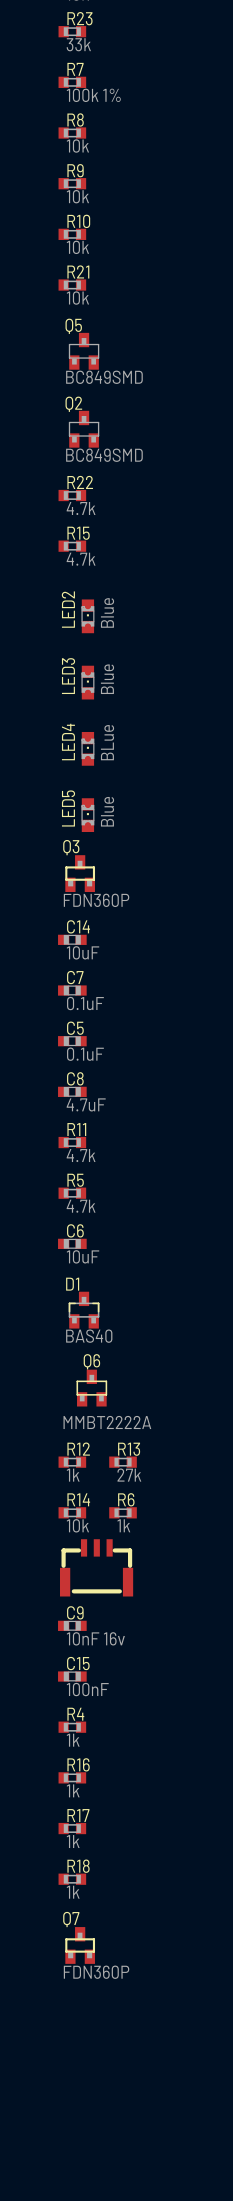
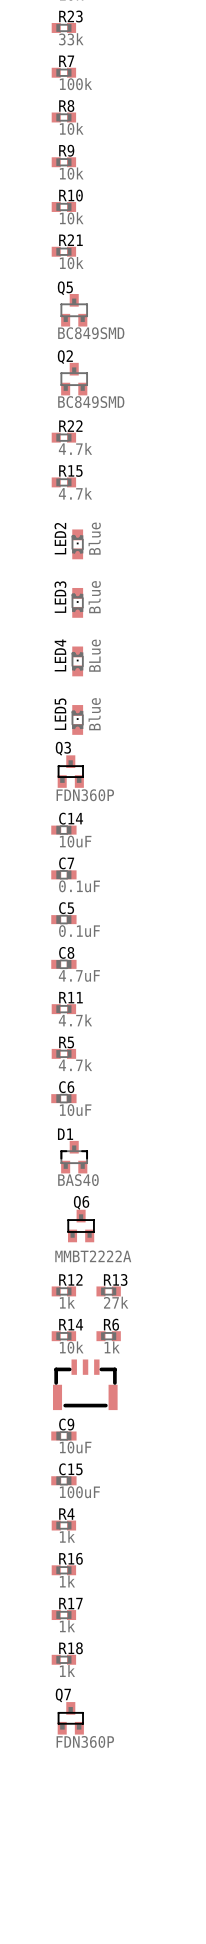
R7 value: 100k 1% (93, 95) -> 100k (75, 84)
C9 value: 10nF 16v (95, 1638) -> 10uF (75, 1447)
C15 value: 100nF (87, 1689) -> 100uF (79, 1492)

